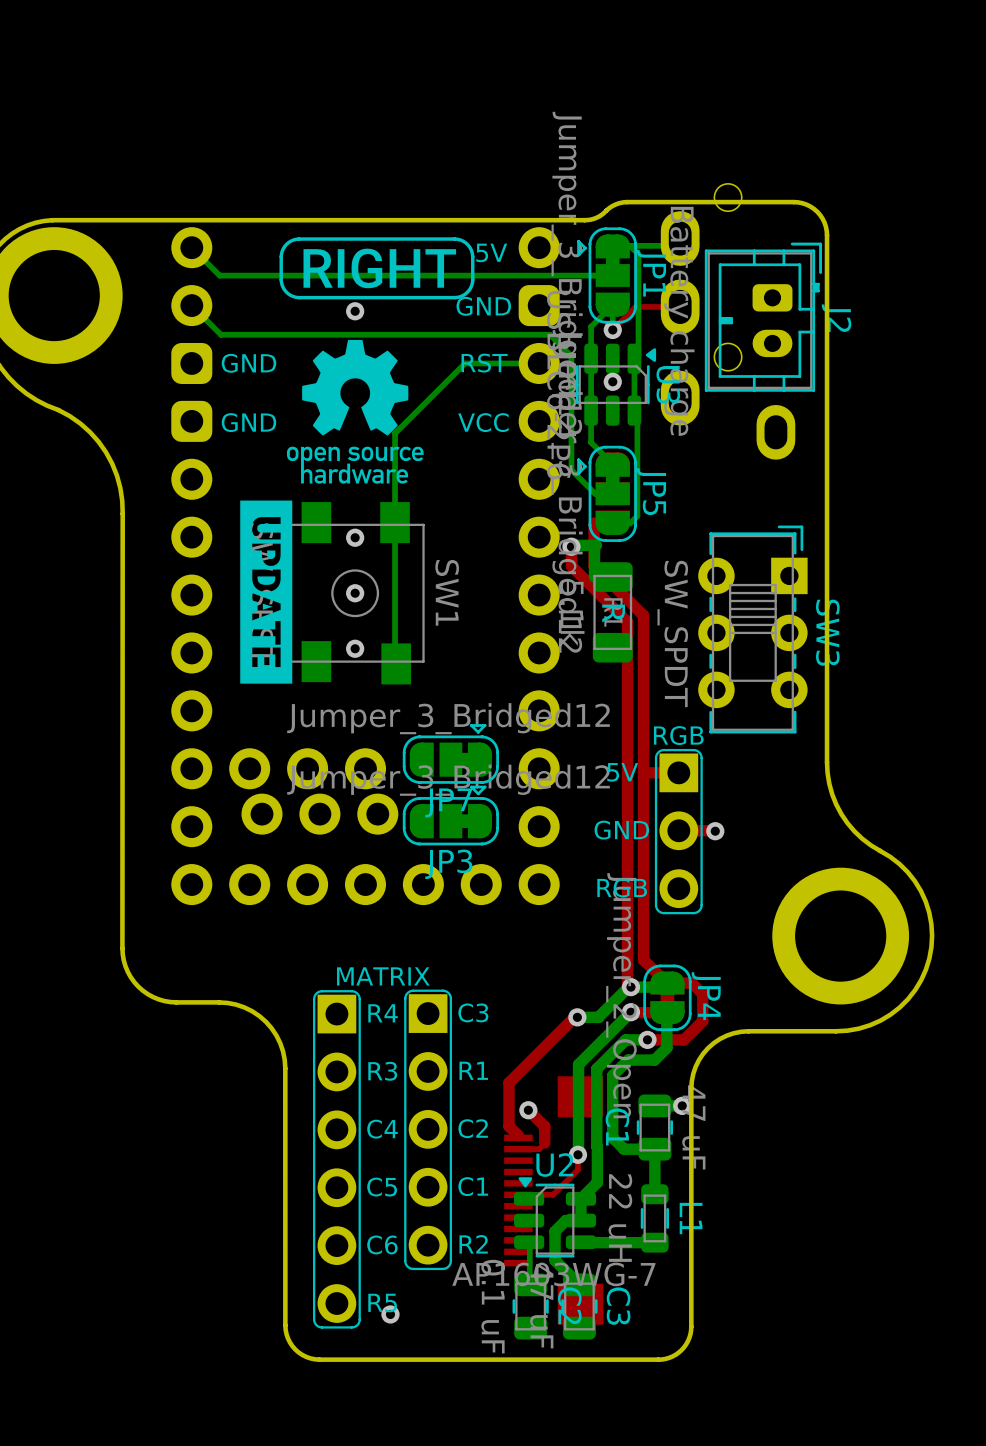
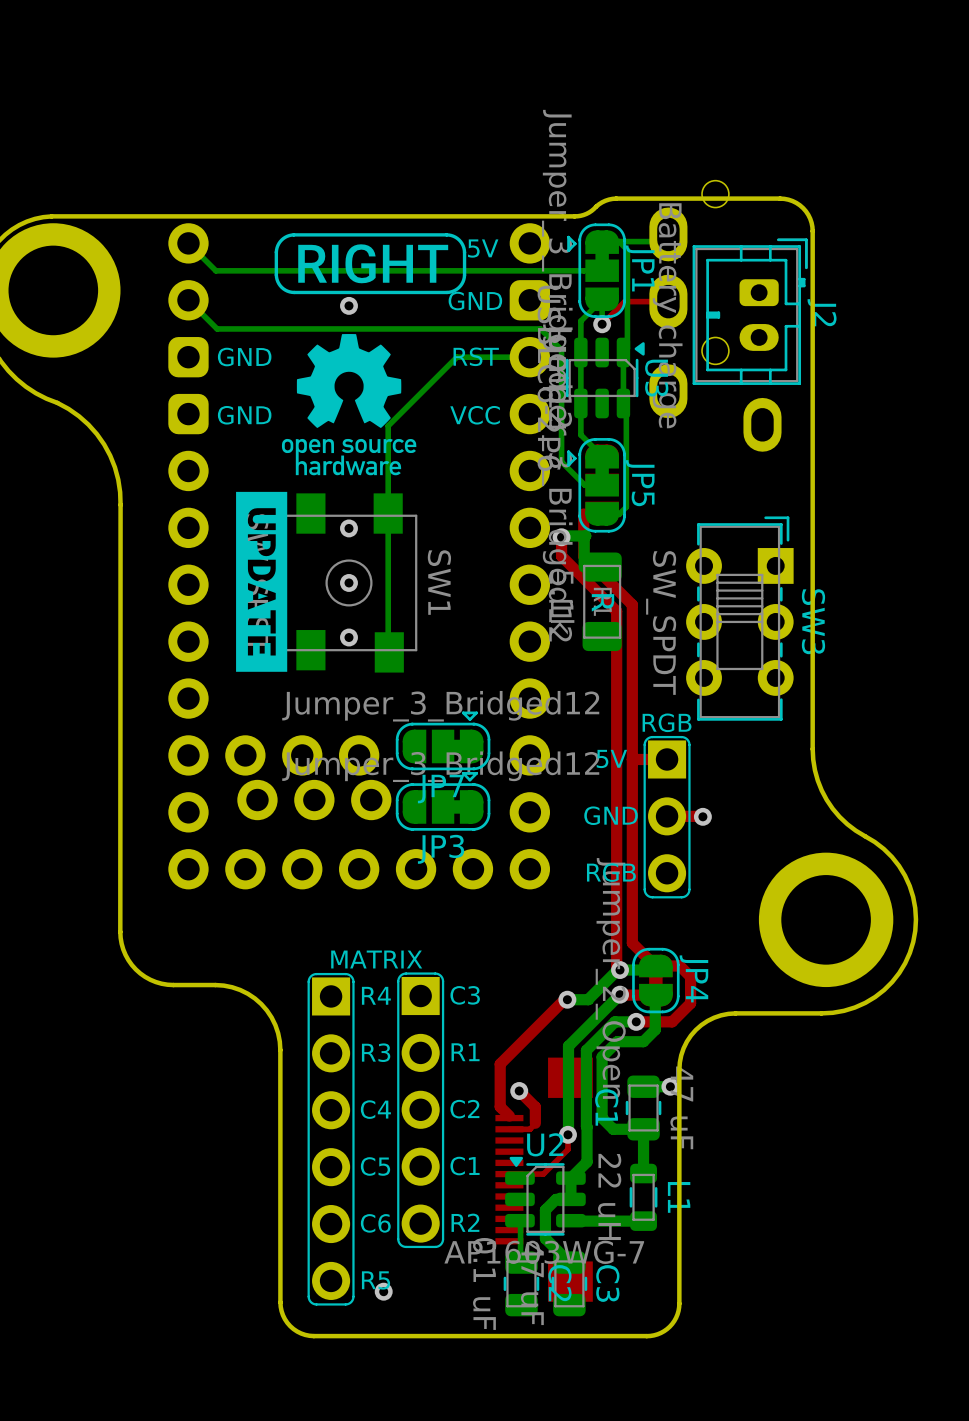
via: (612, 381) -> none

